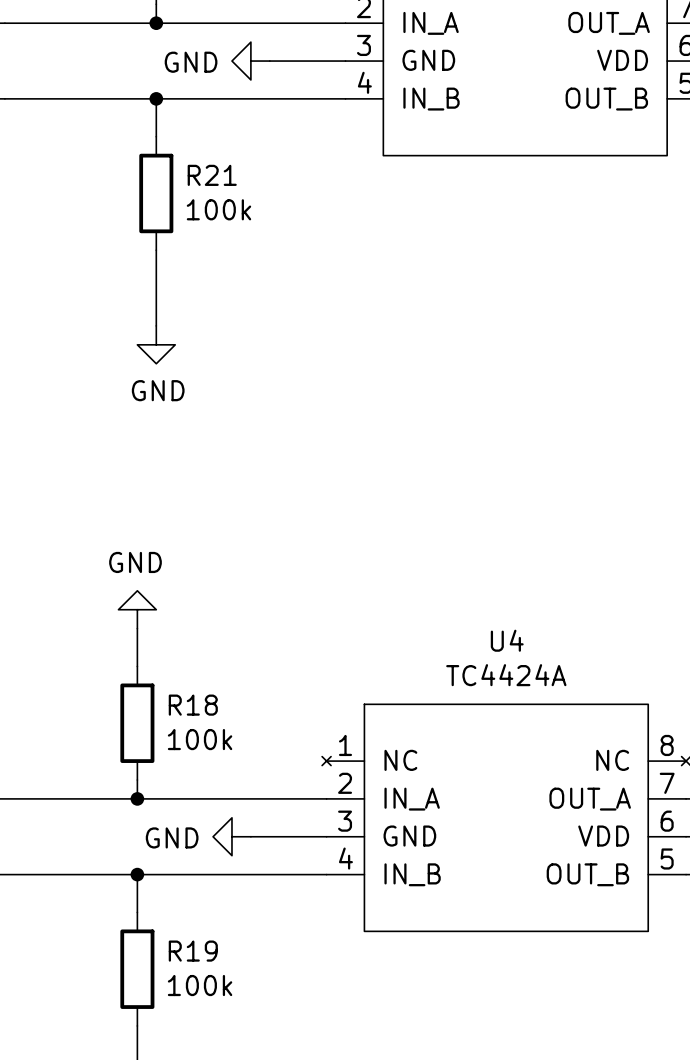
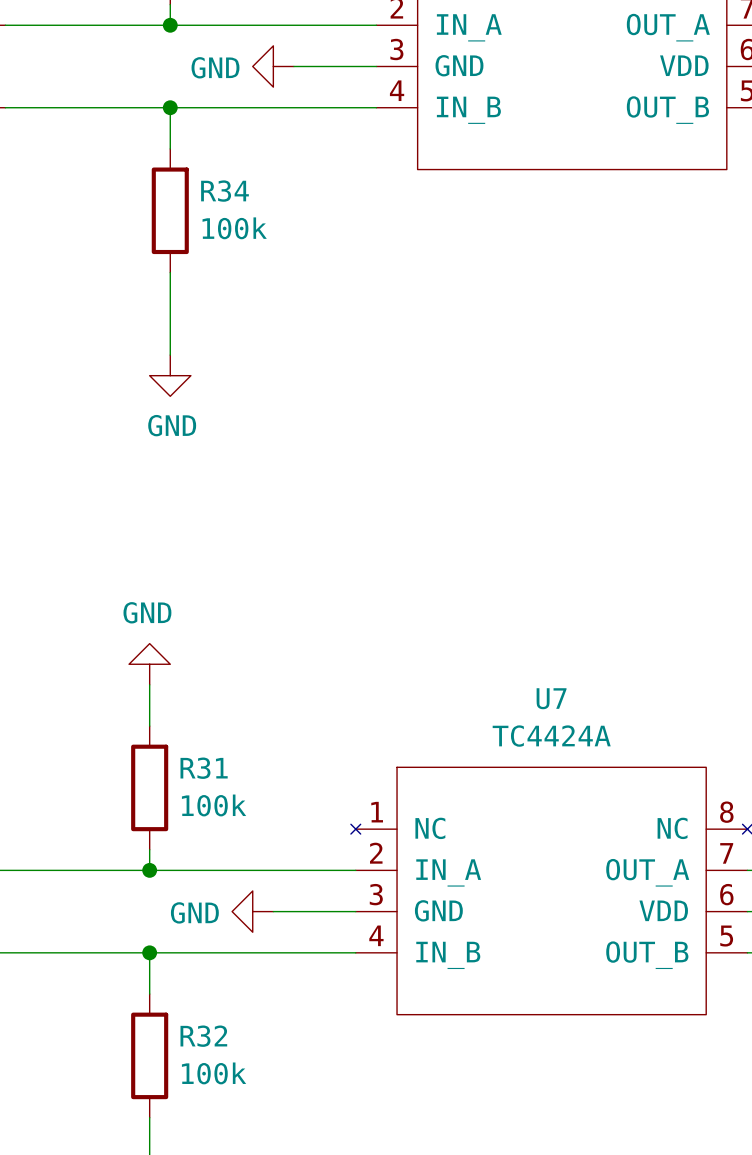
R21 name: R21 (212, 175) -> R34 (224, 191)
U4 name: U4 (507, 640) -> U7 (551, 698)
R18 name: R18 (193, 705) -> R31 (204, 768)
R19 name: R19 (193, 951) -> R32 (203, 1036)

